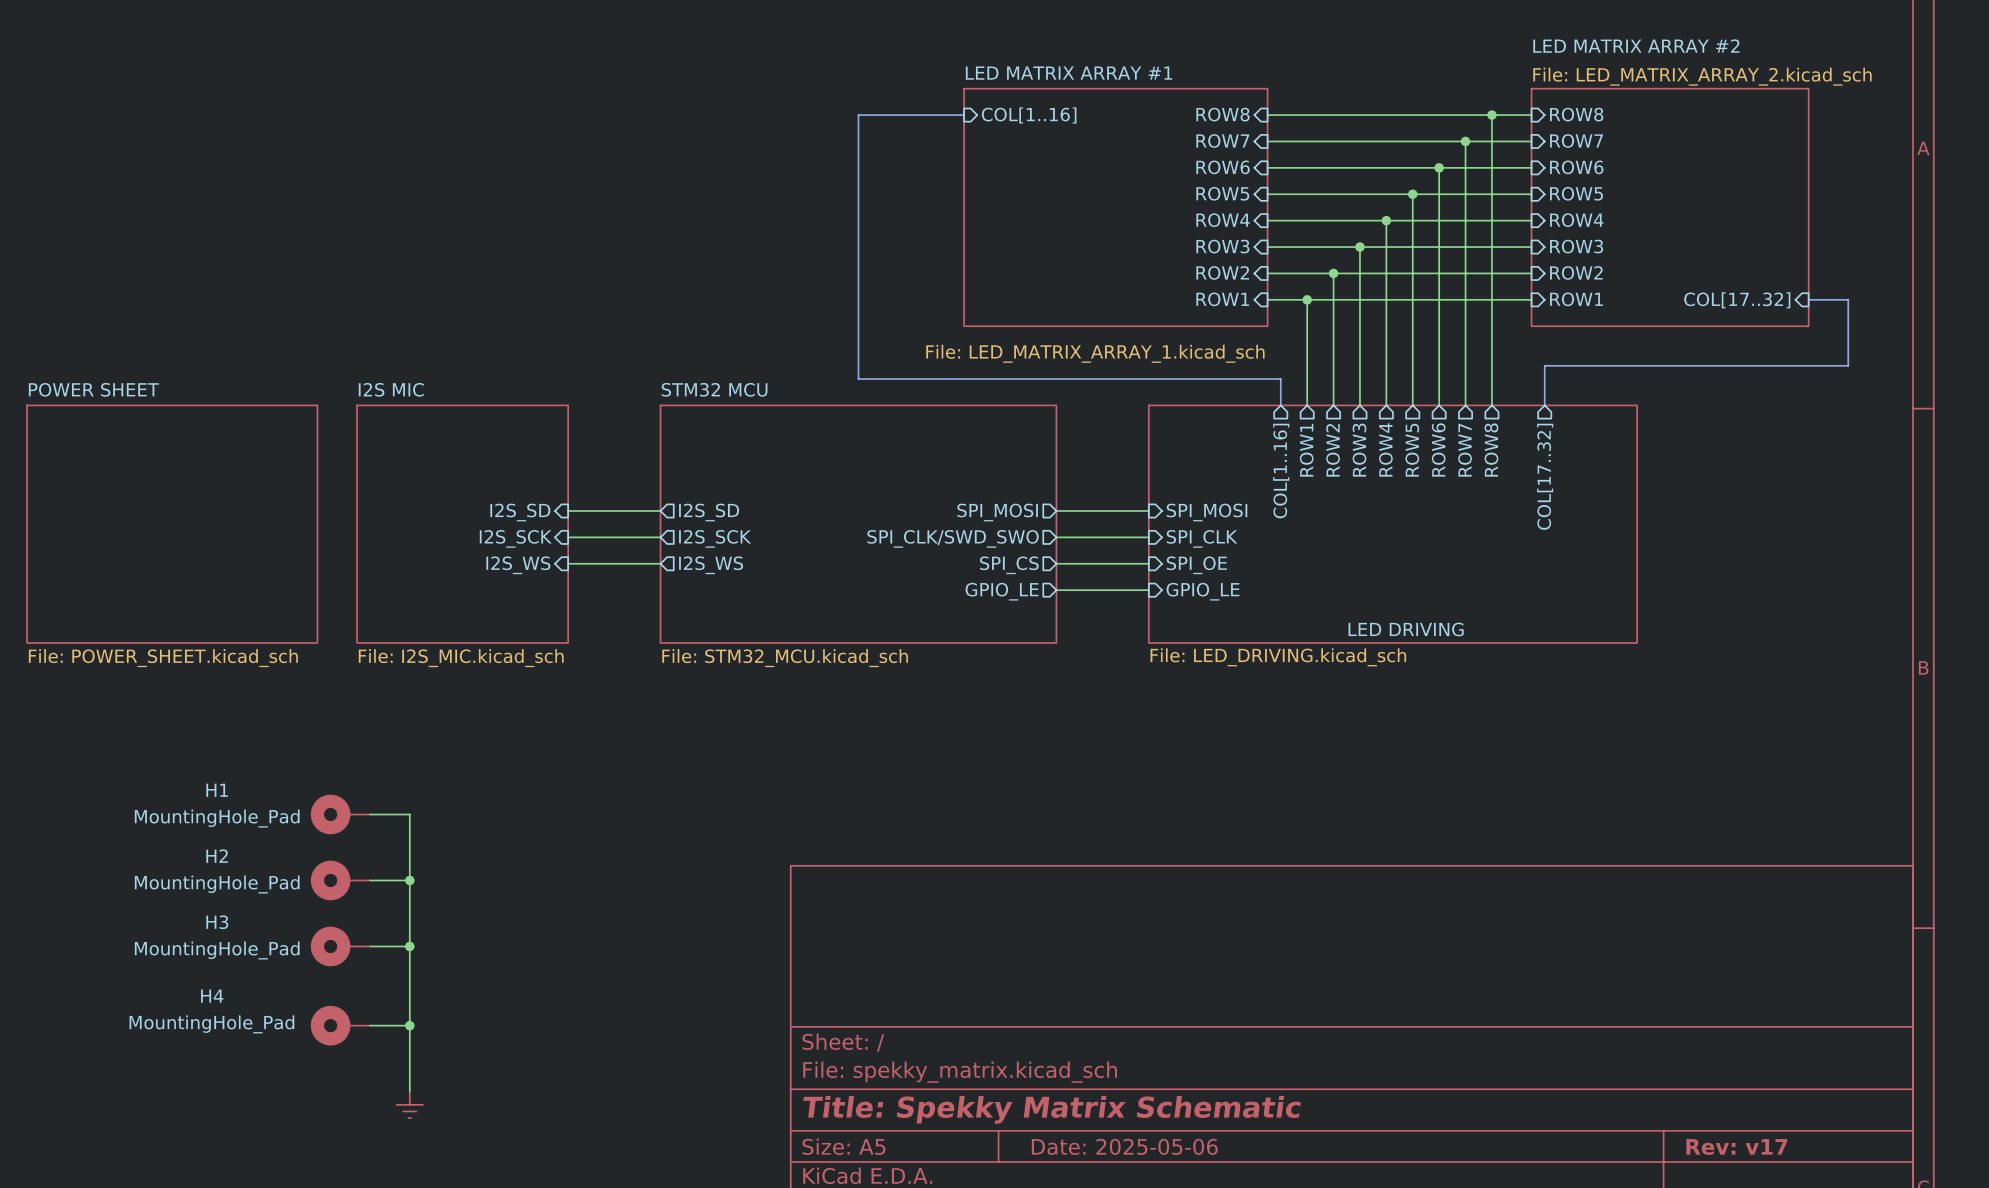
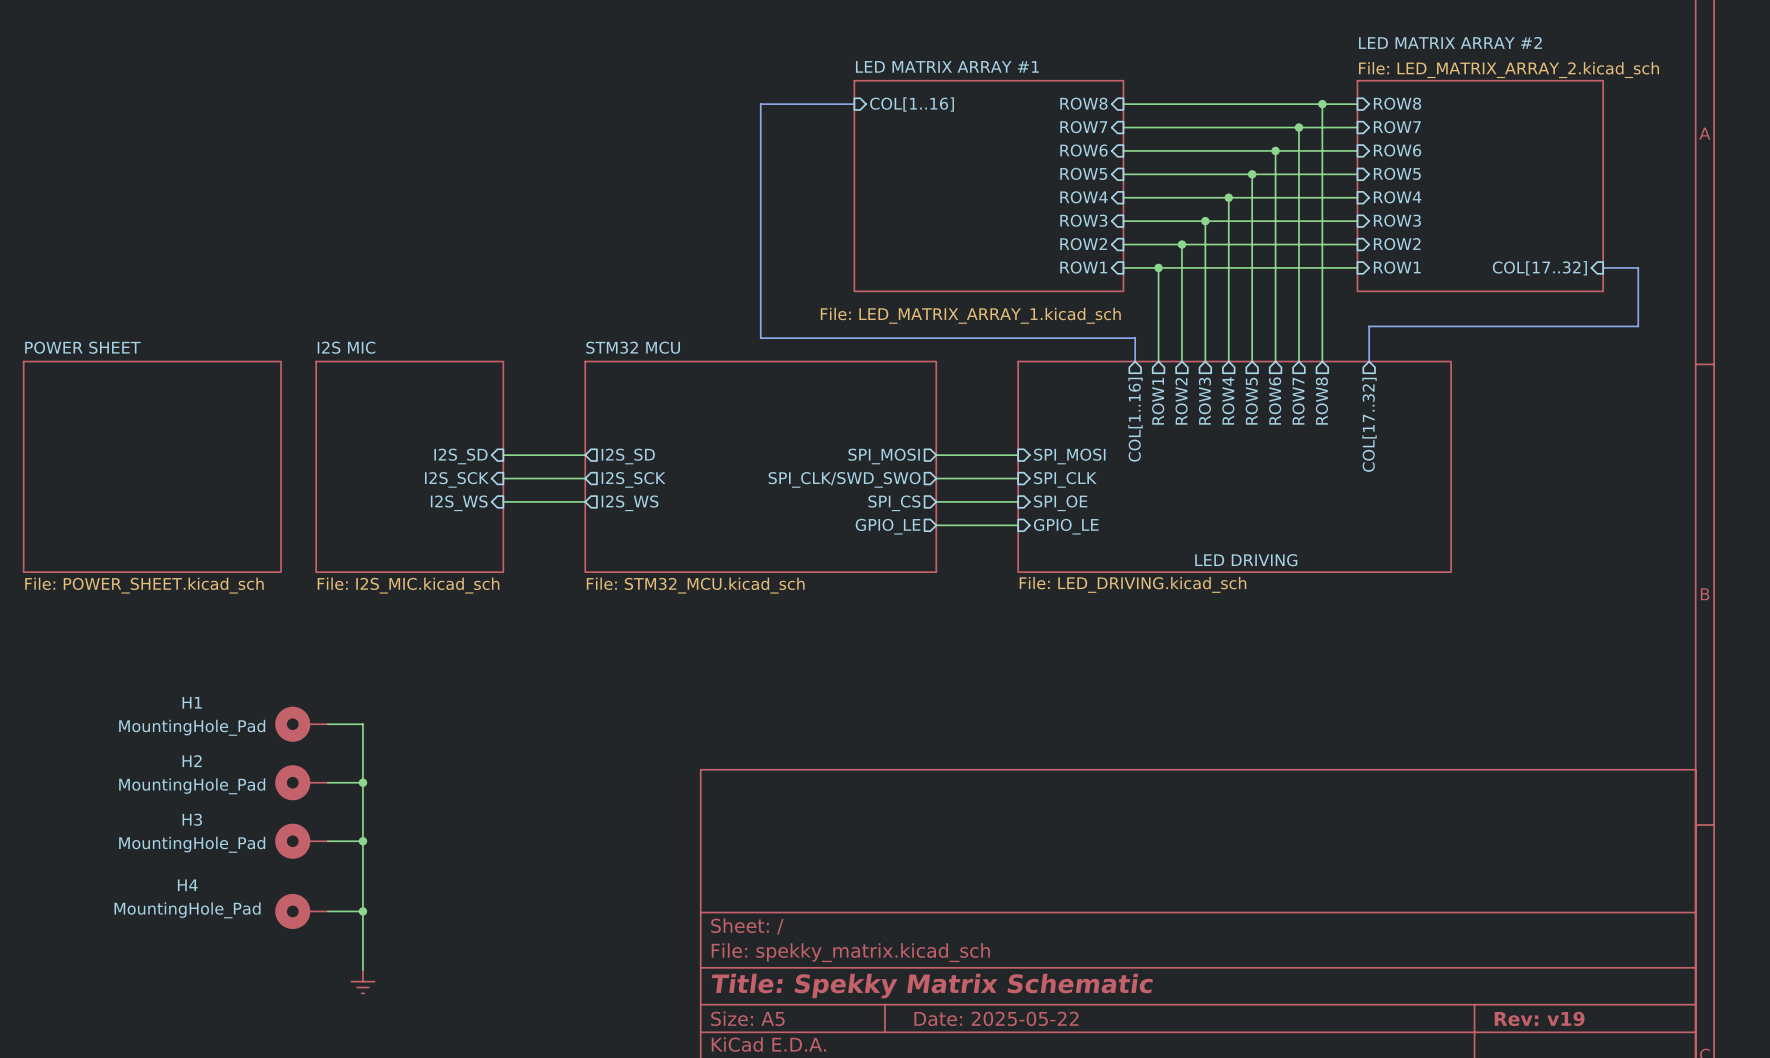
title block: Date: 2025-05-06 (1124, 1146) -> Date: 2025-05-22 (996, 1018)
title block: Rev: v17 (1736, 1147) -> Rev: v19 (1539, 1018)

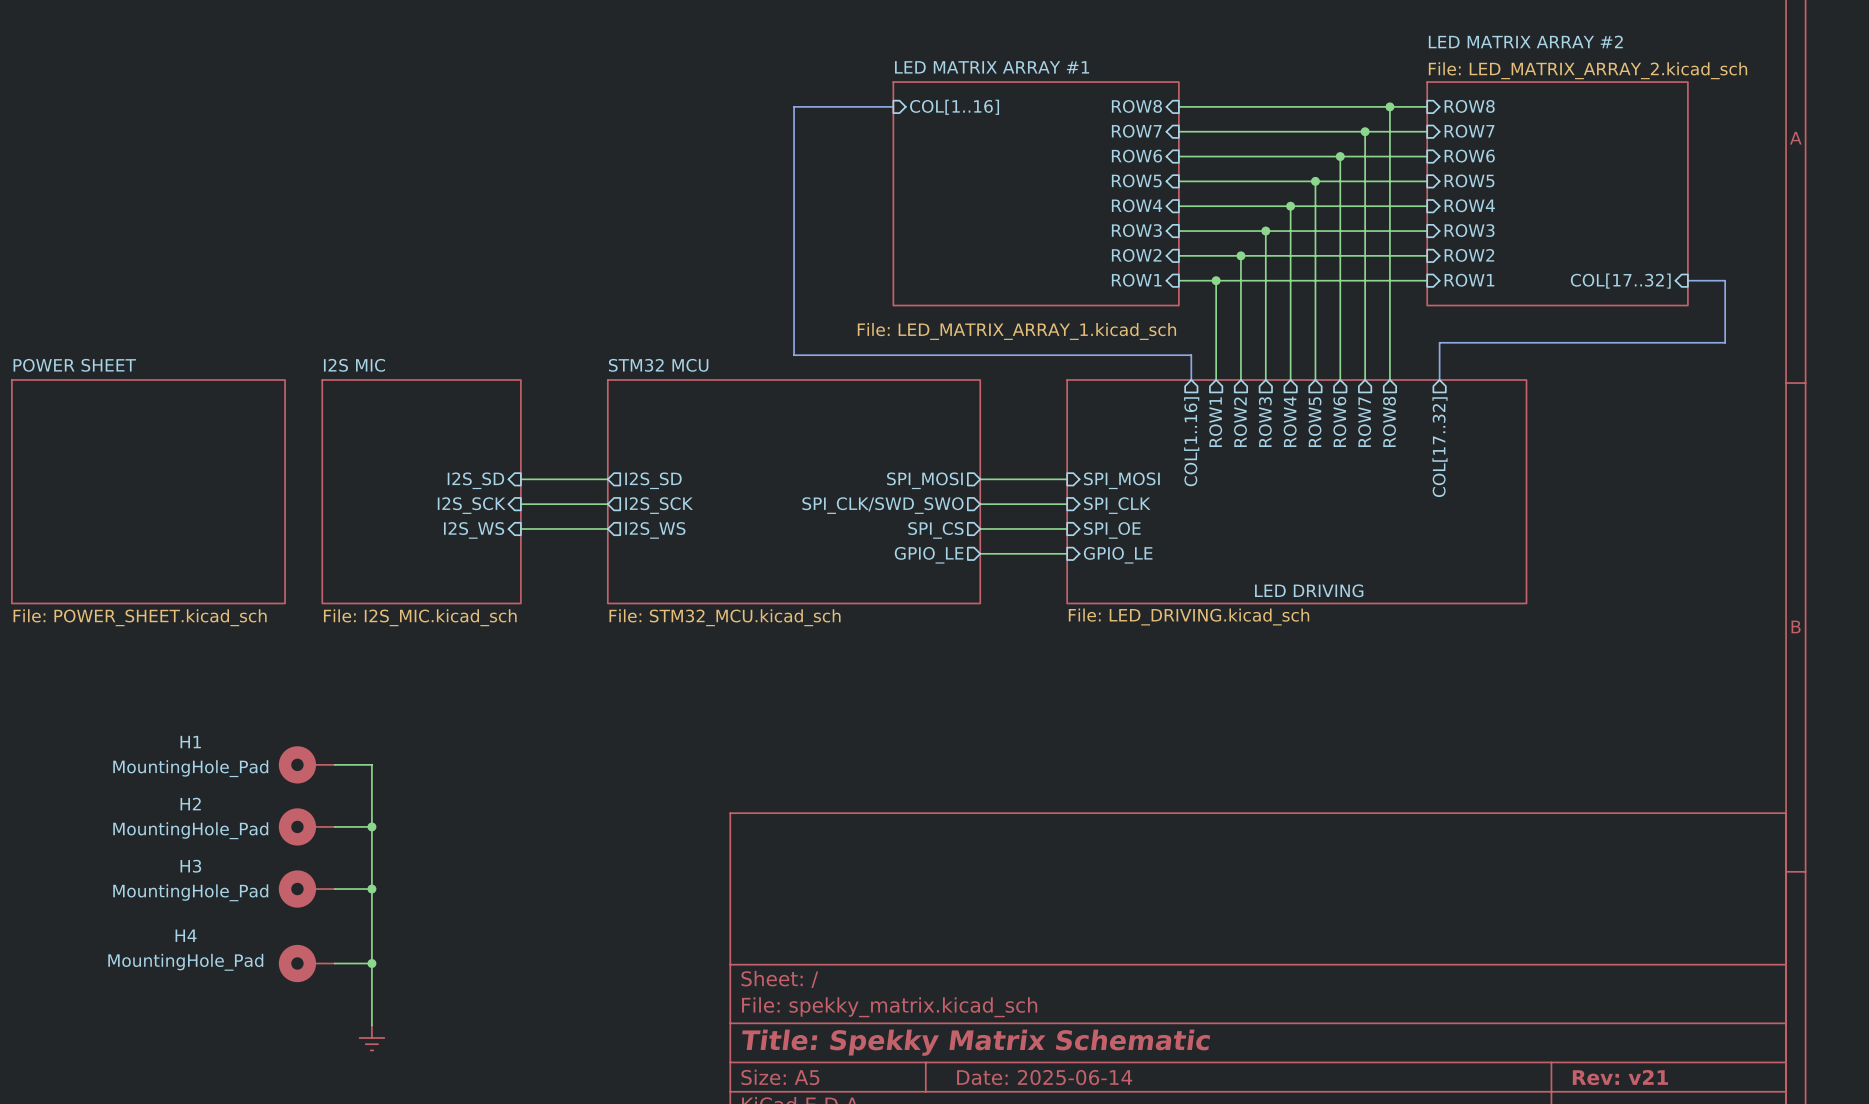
title block: Date: 2025-05-22 (996, 1018) -> Date: 2025-06-14 (1044, 1077)
title block: Rev: v19 (1539, 1018) -> Rev: v21 (1620, 1077)

